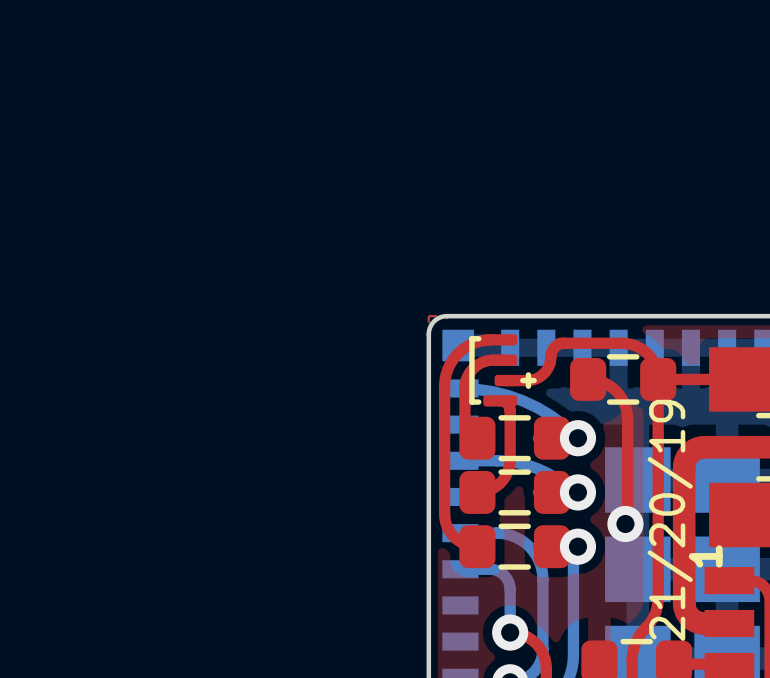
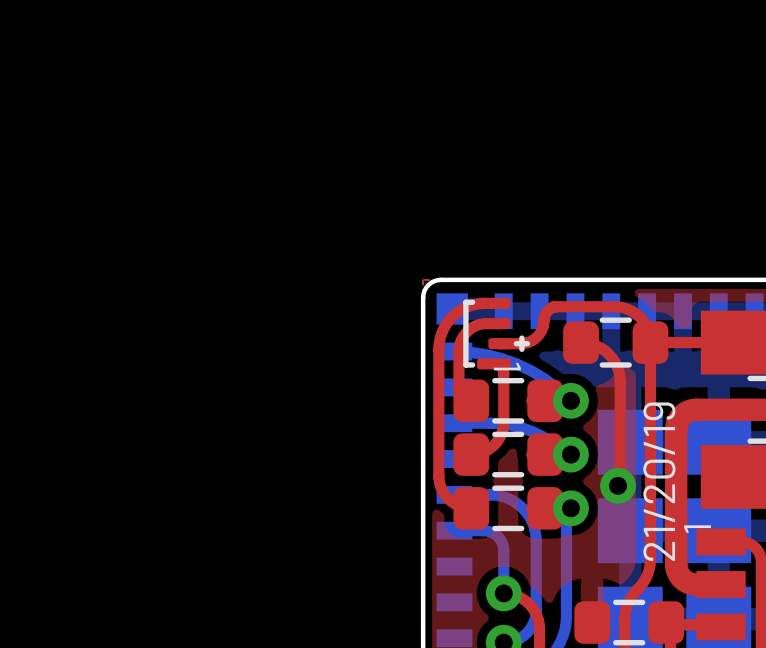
part text: none -> 1 (507, 366)

